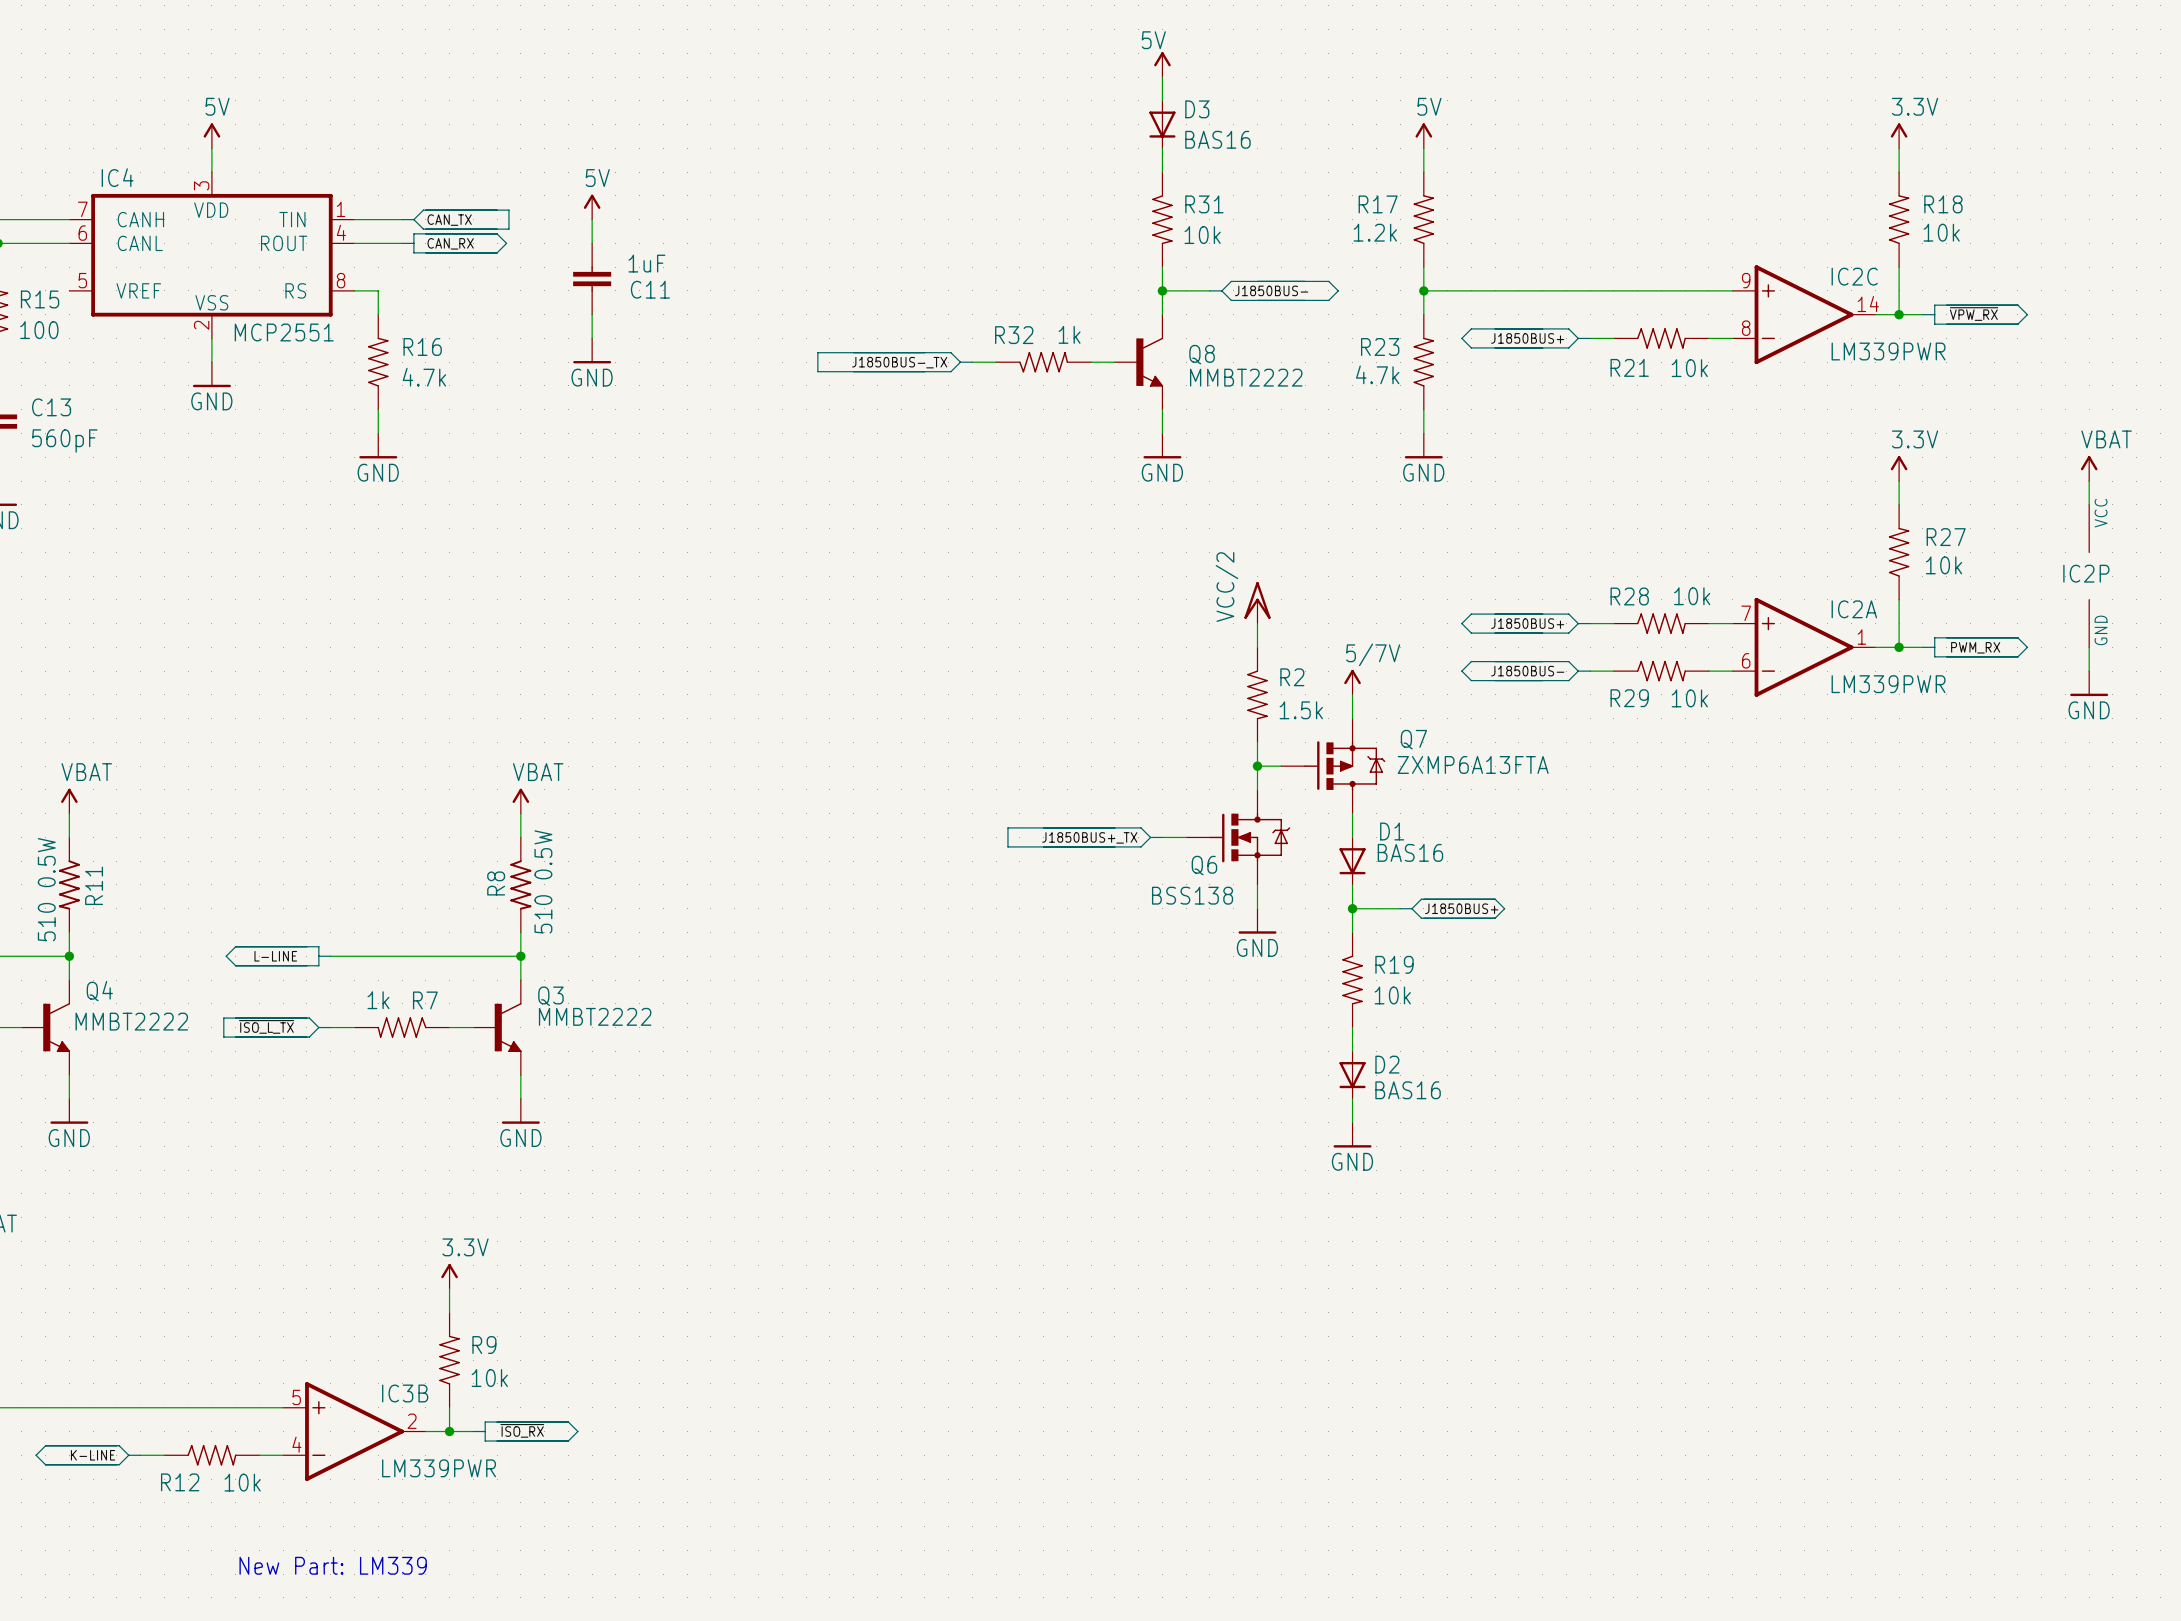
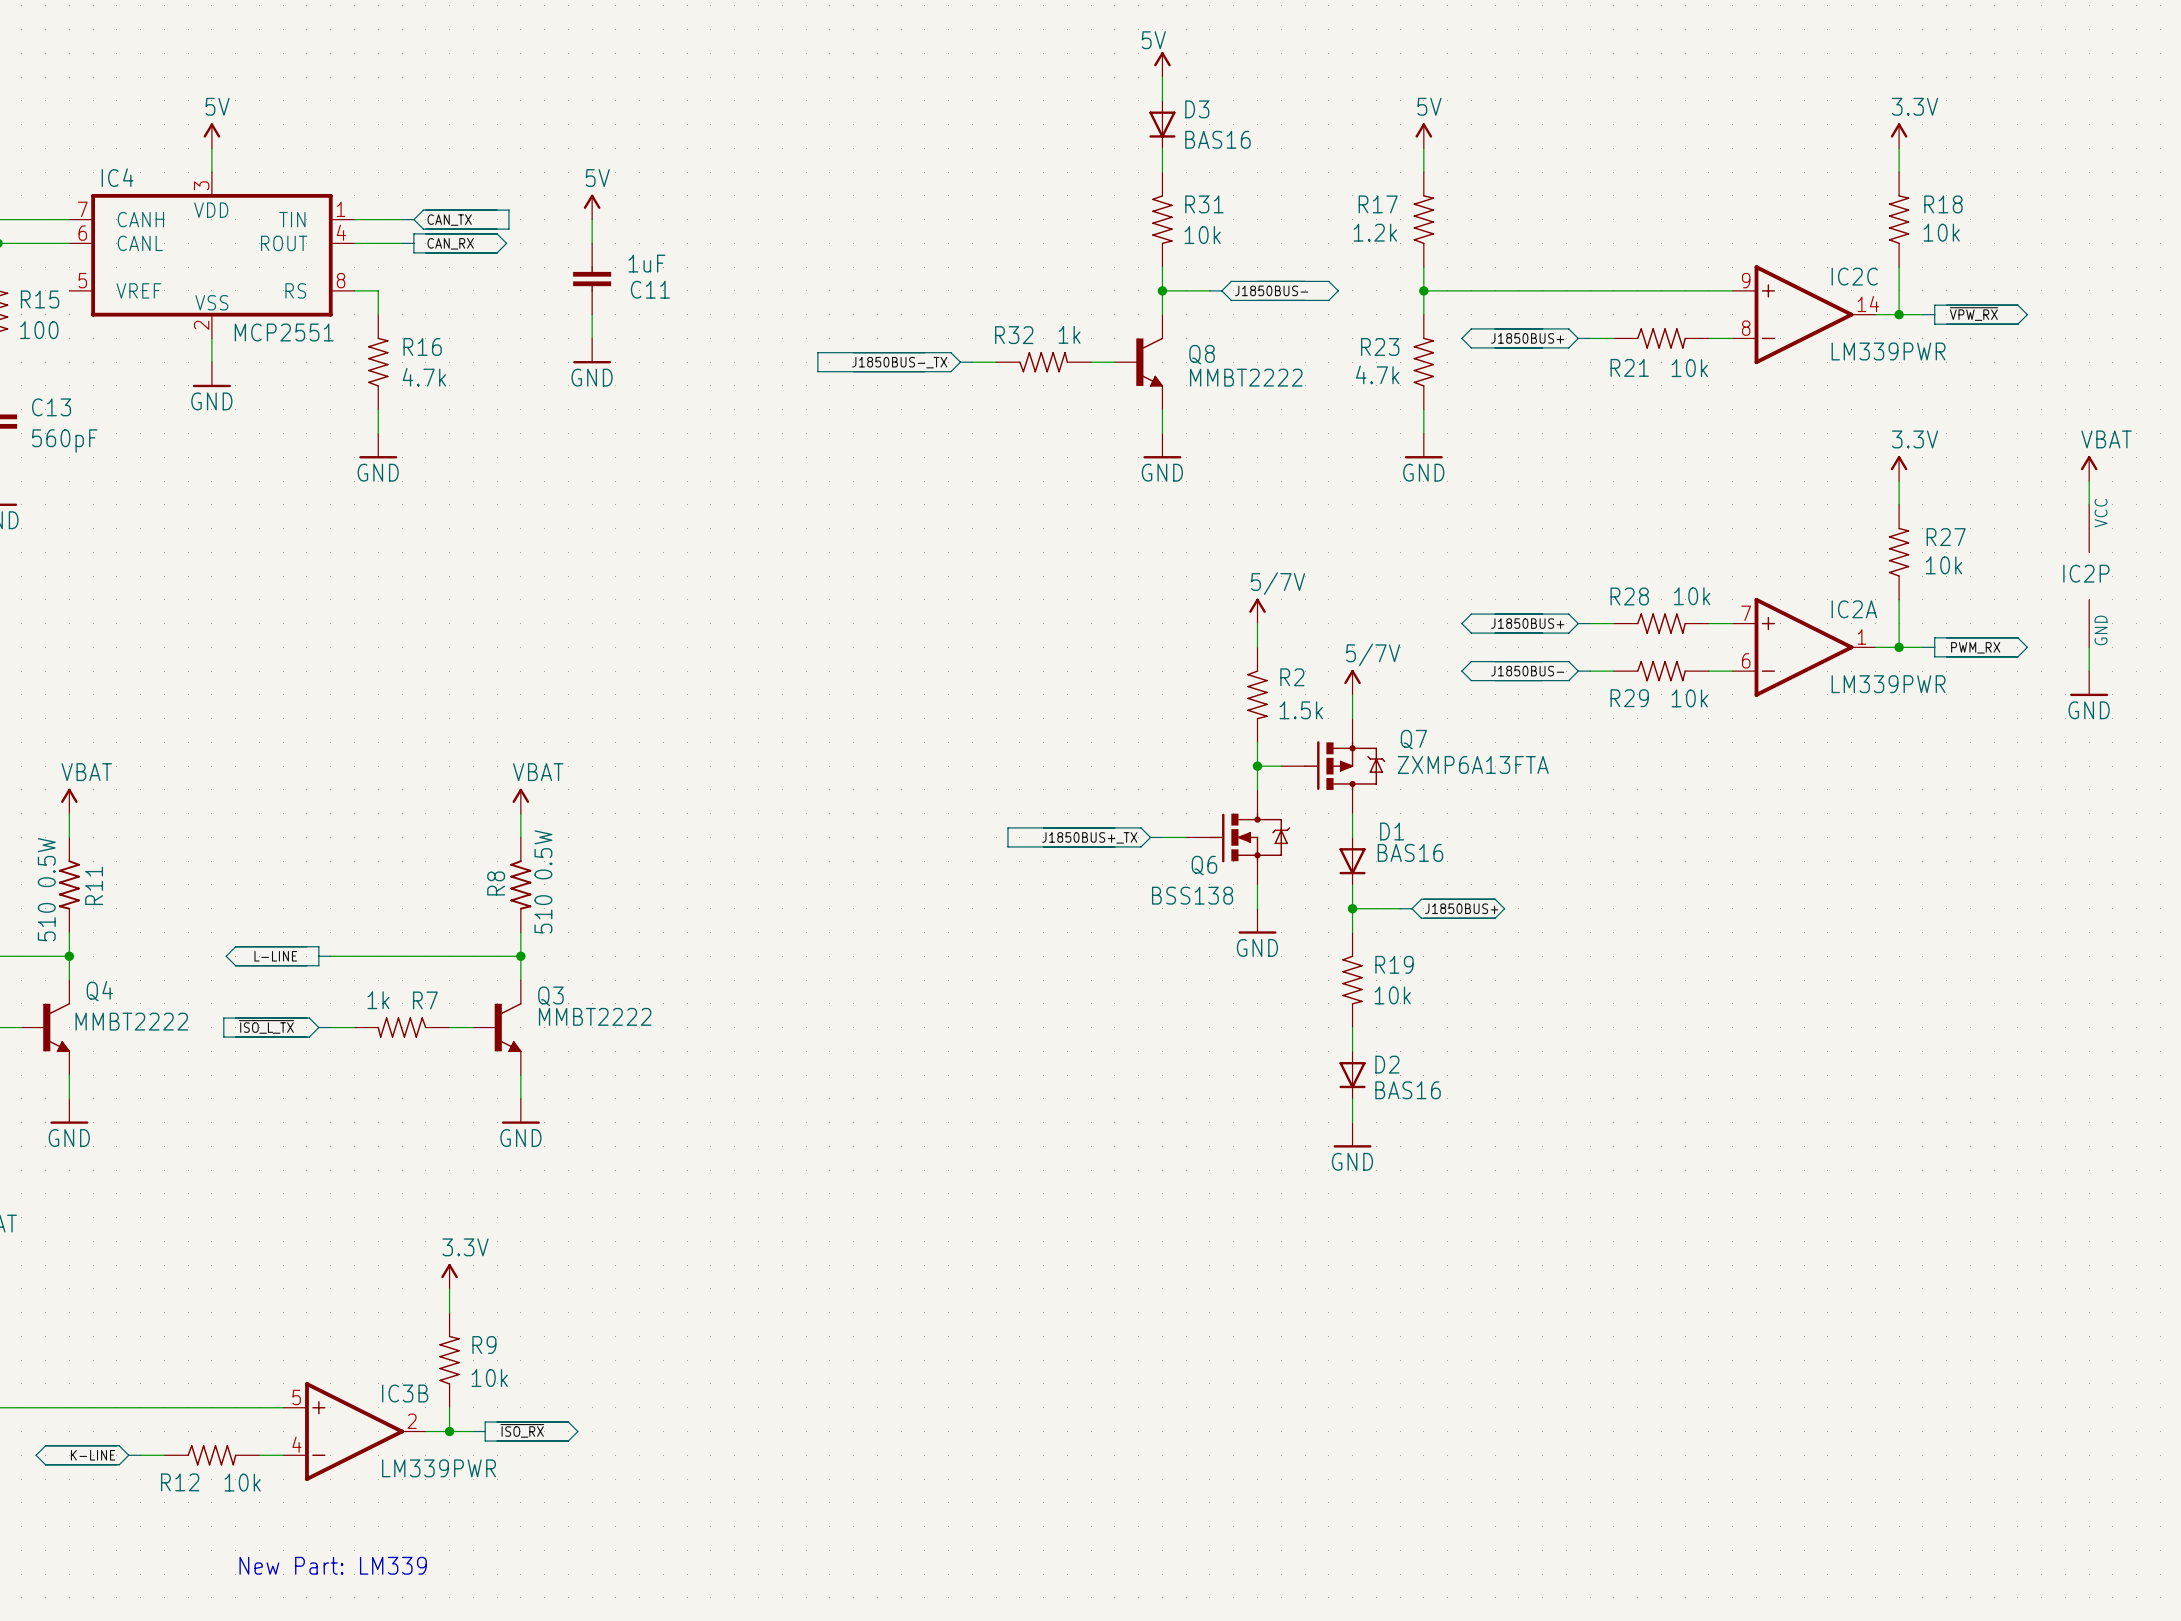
power symbol: VCC/2 (1257, 602) -> 5/7V (1257, 611)

